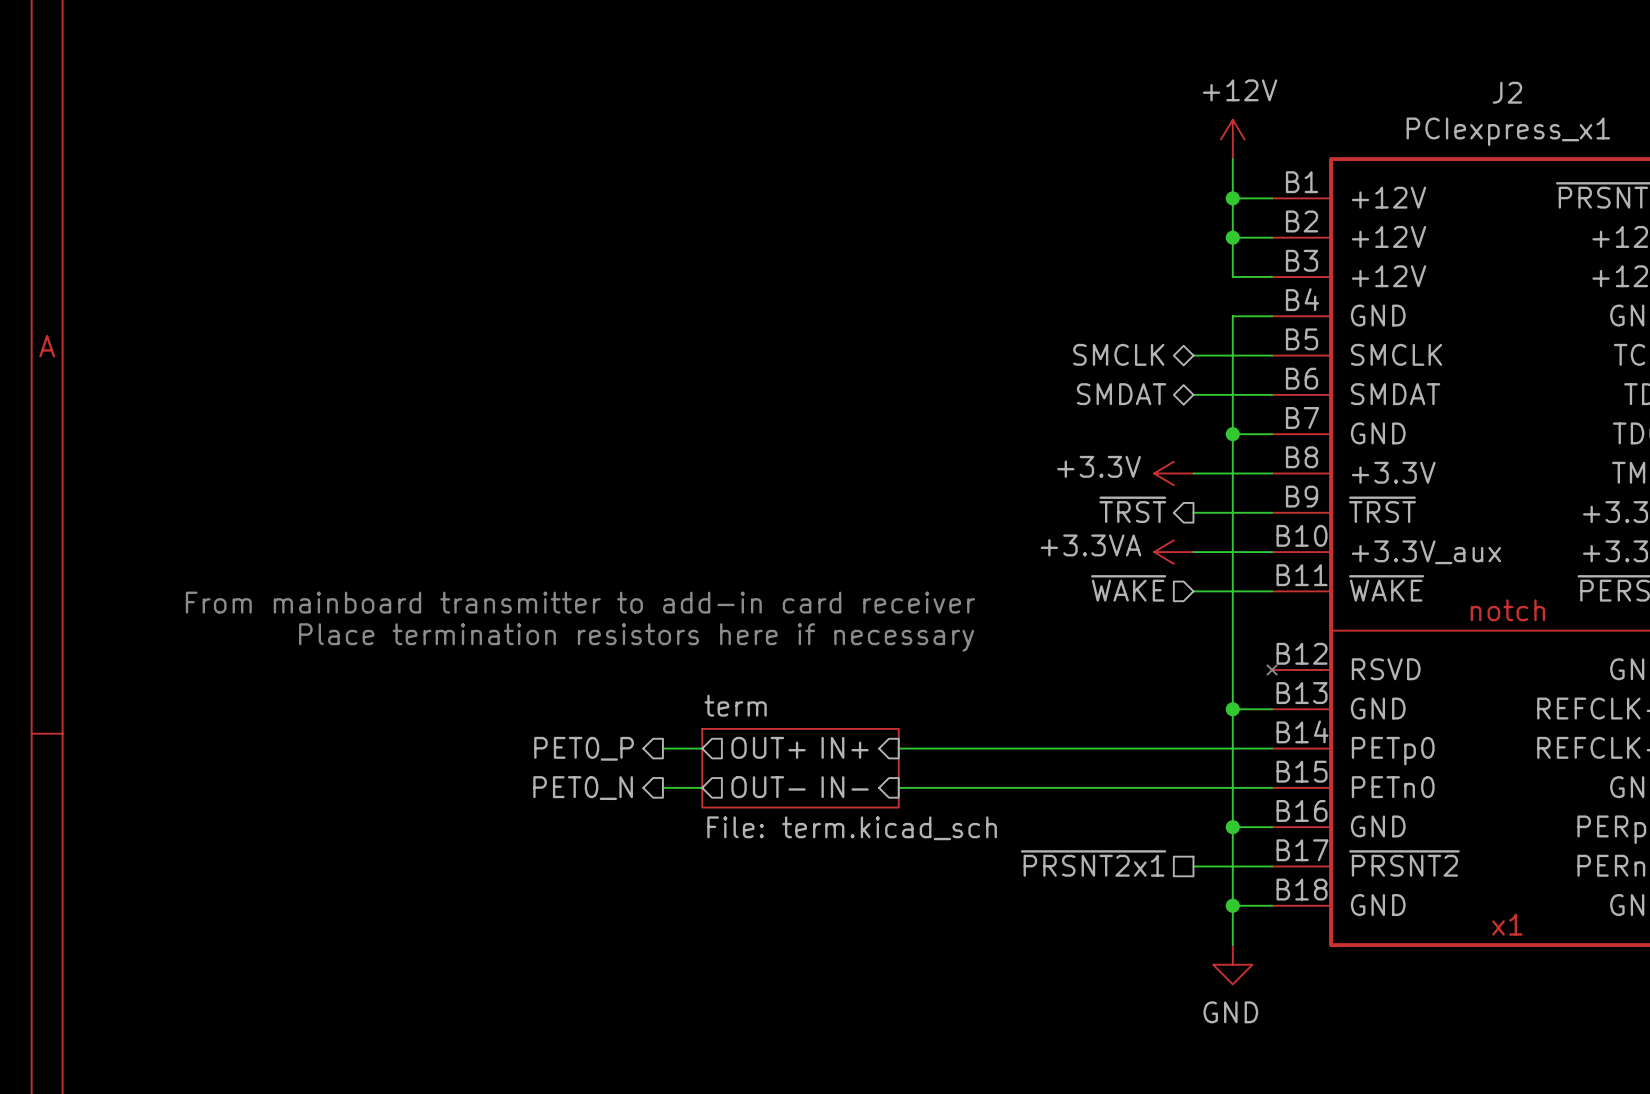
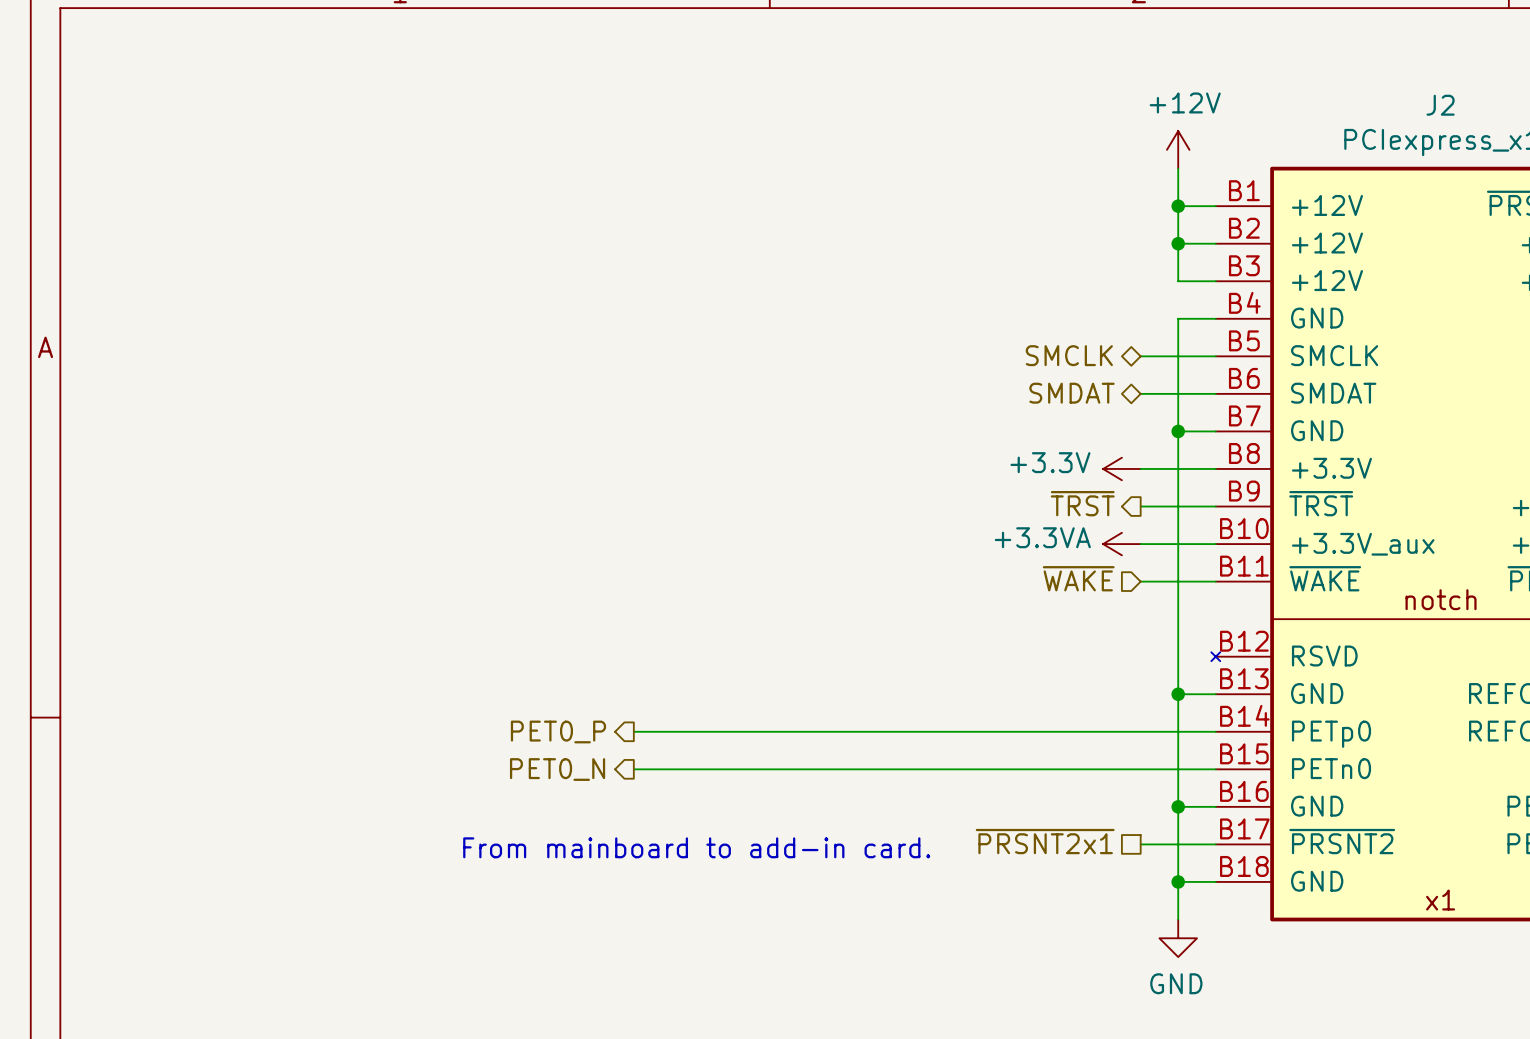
text: From mainboard transmitter to add-in card receiver (580, 602) -> none
text: Place termination resistors here if necessary (636, 637) -> none
sheet pin: OUT+ (768, 747) -> none
sheet pin: IN+ (845, 747) -> none
wire: none -> (671, 731) (859, 731)
sheet term: File: term.kicad_sch (800, 768) -> none
wire: none -> (671, 769) (859, 769)
sheet pin: OUT- (768, 787) -> none
sheet pin: IN- (845, 787) -> none
text: none -> From mainboard to add-in card. (696, 847)

